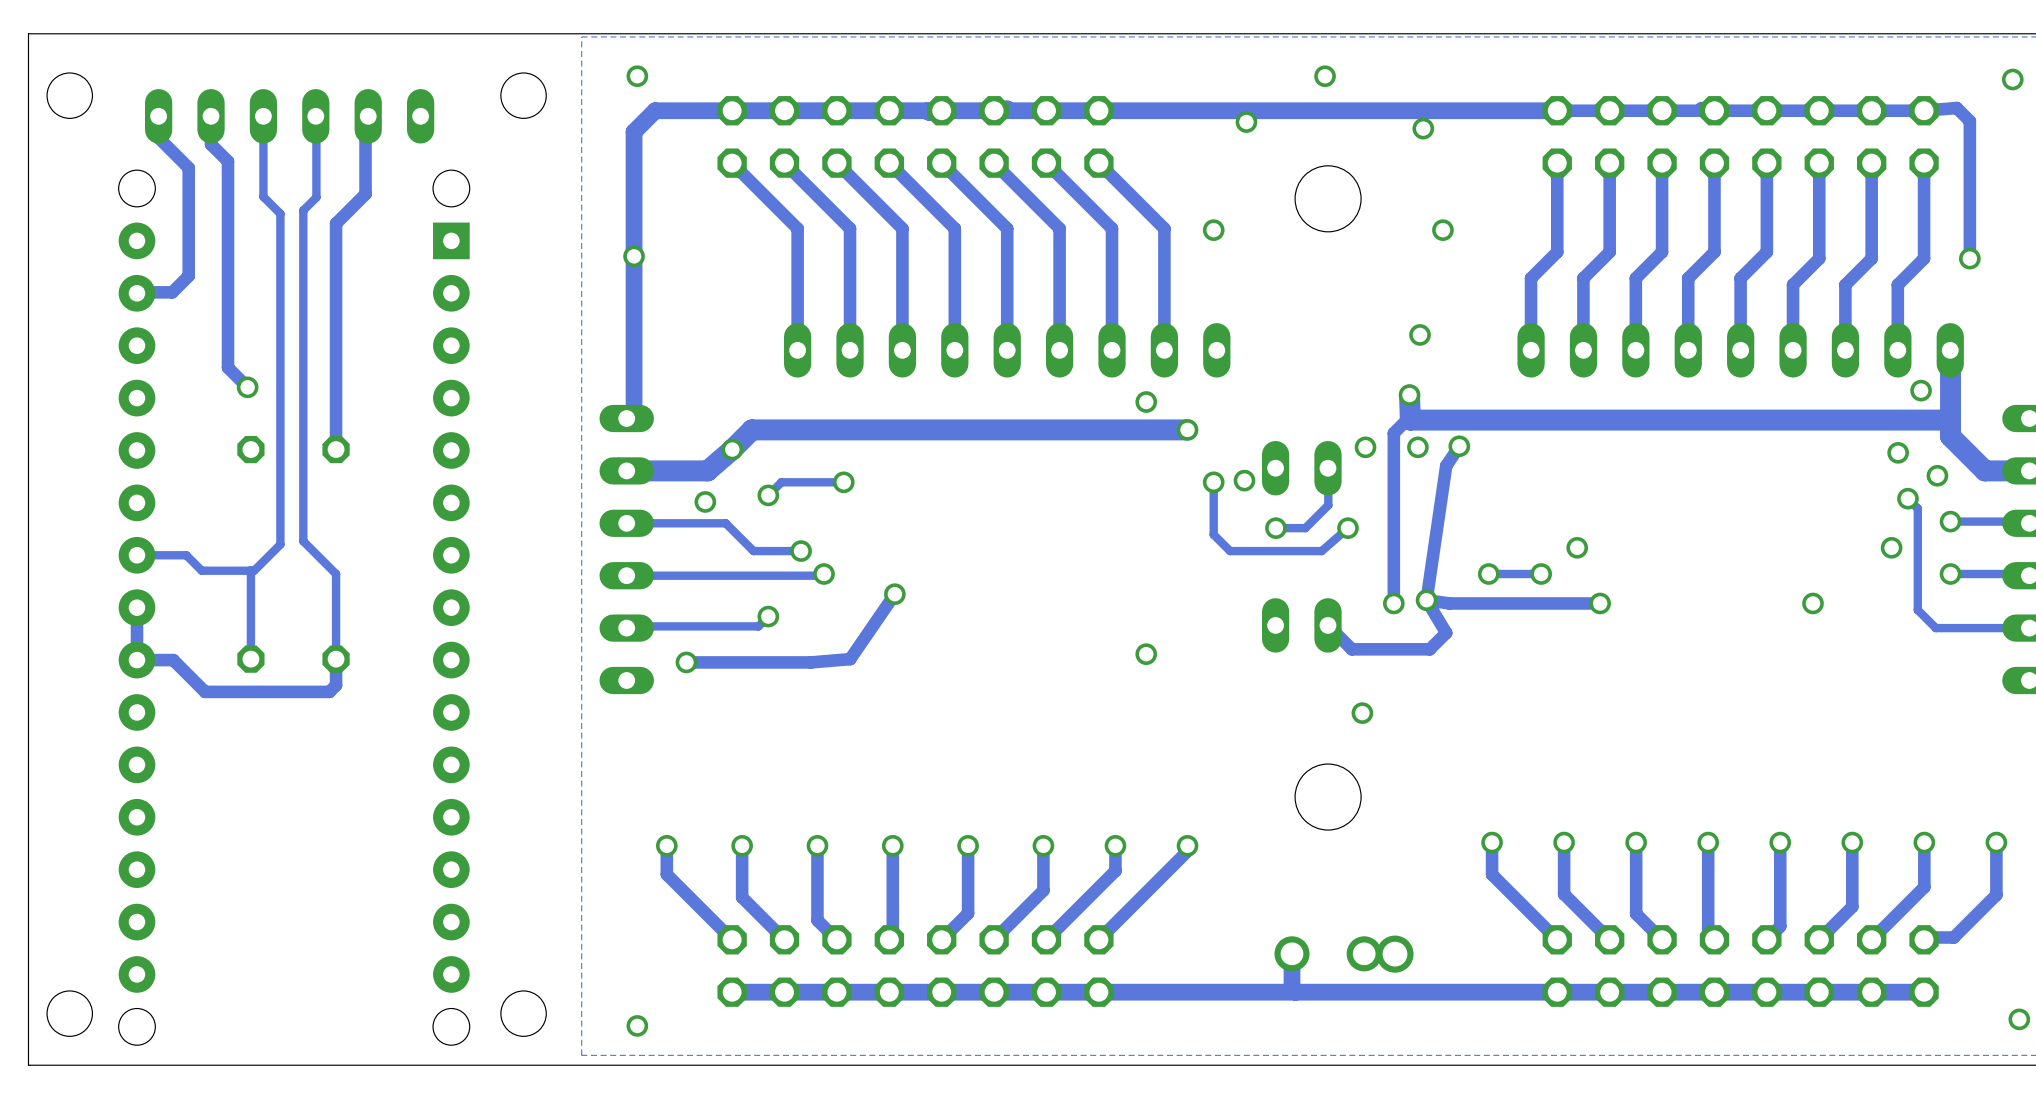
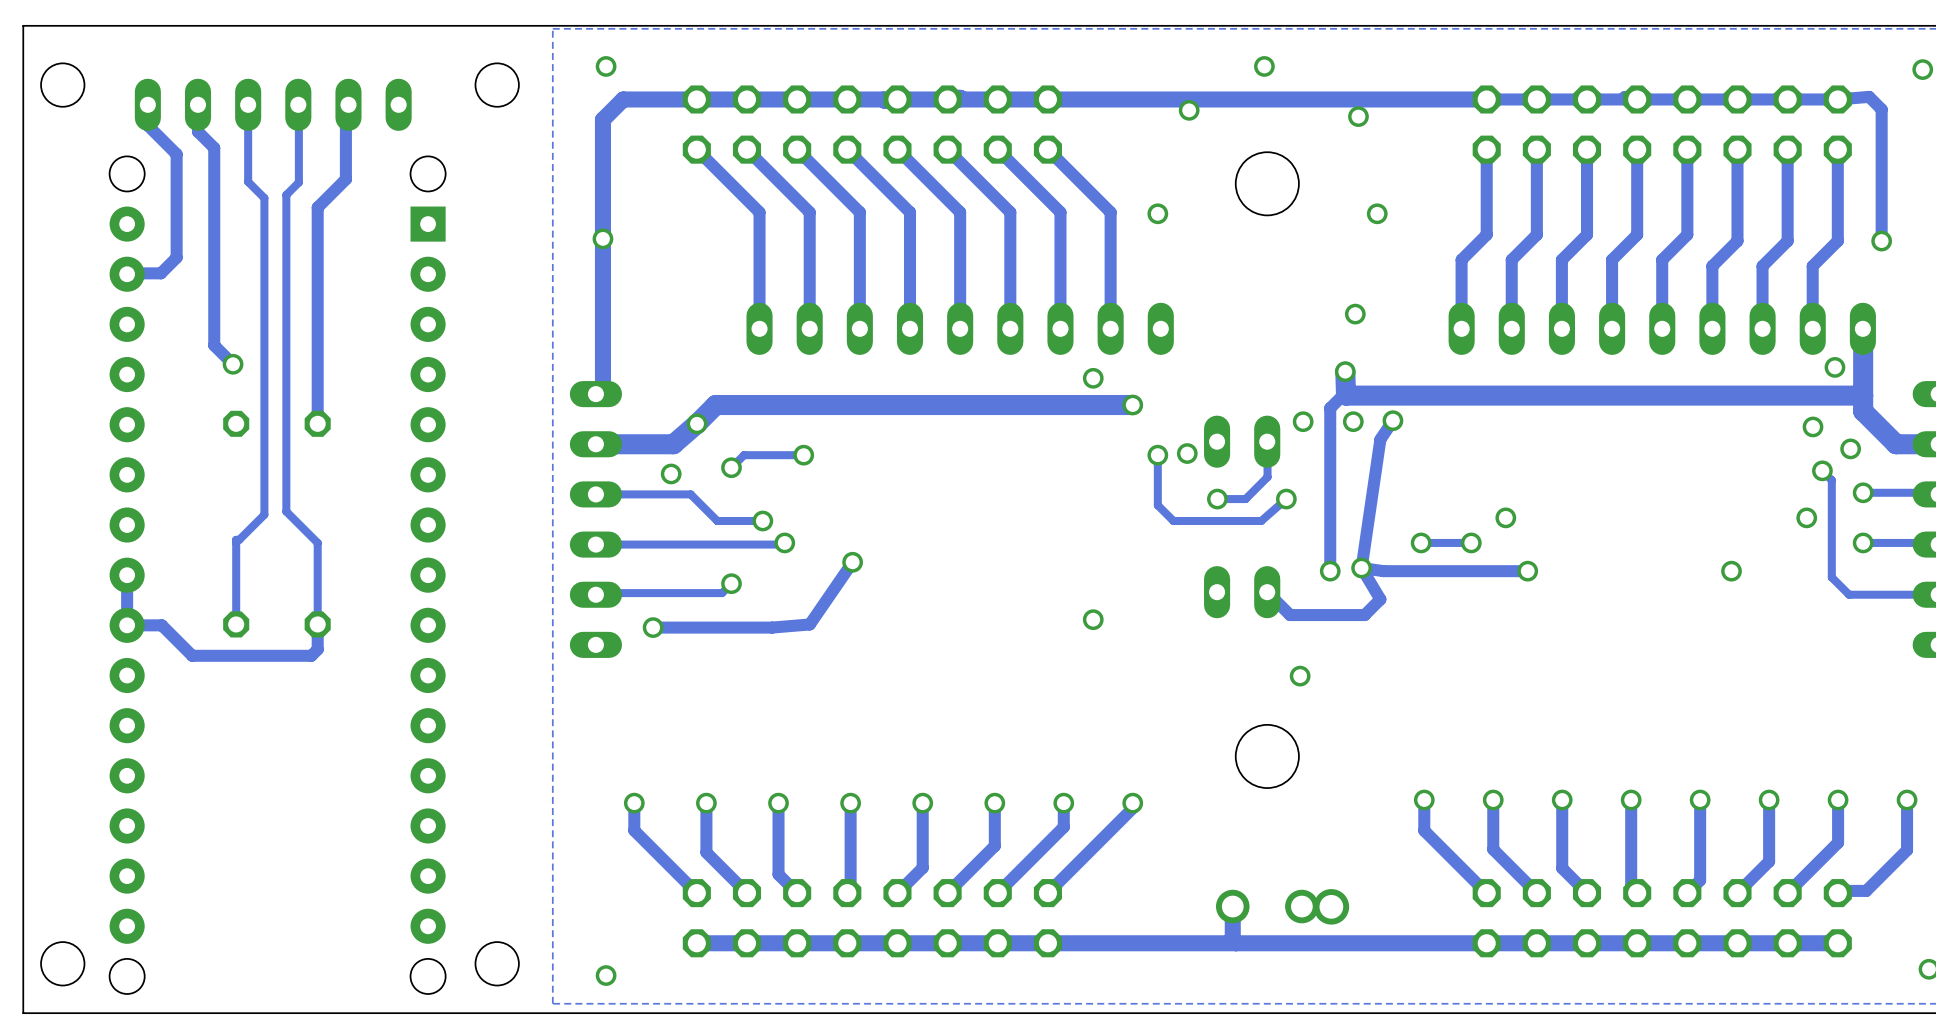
track: (136, 555) (186, 555) (201, 570) (250, 571) -> none

